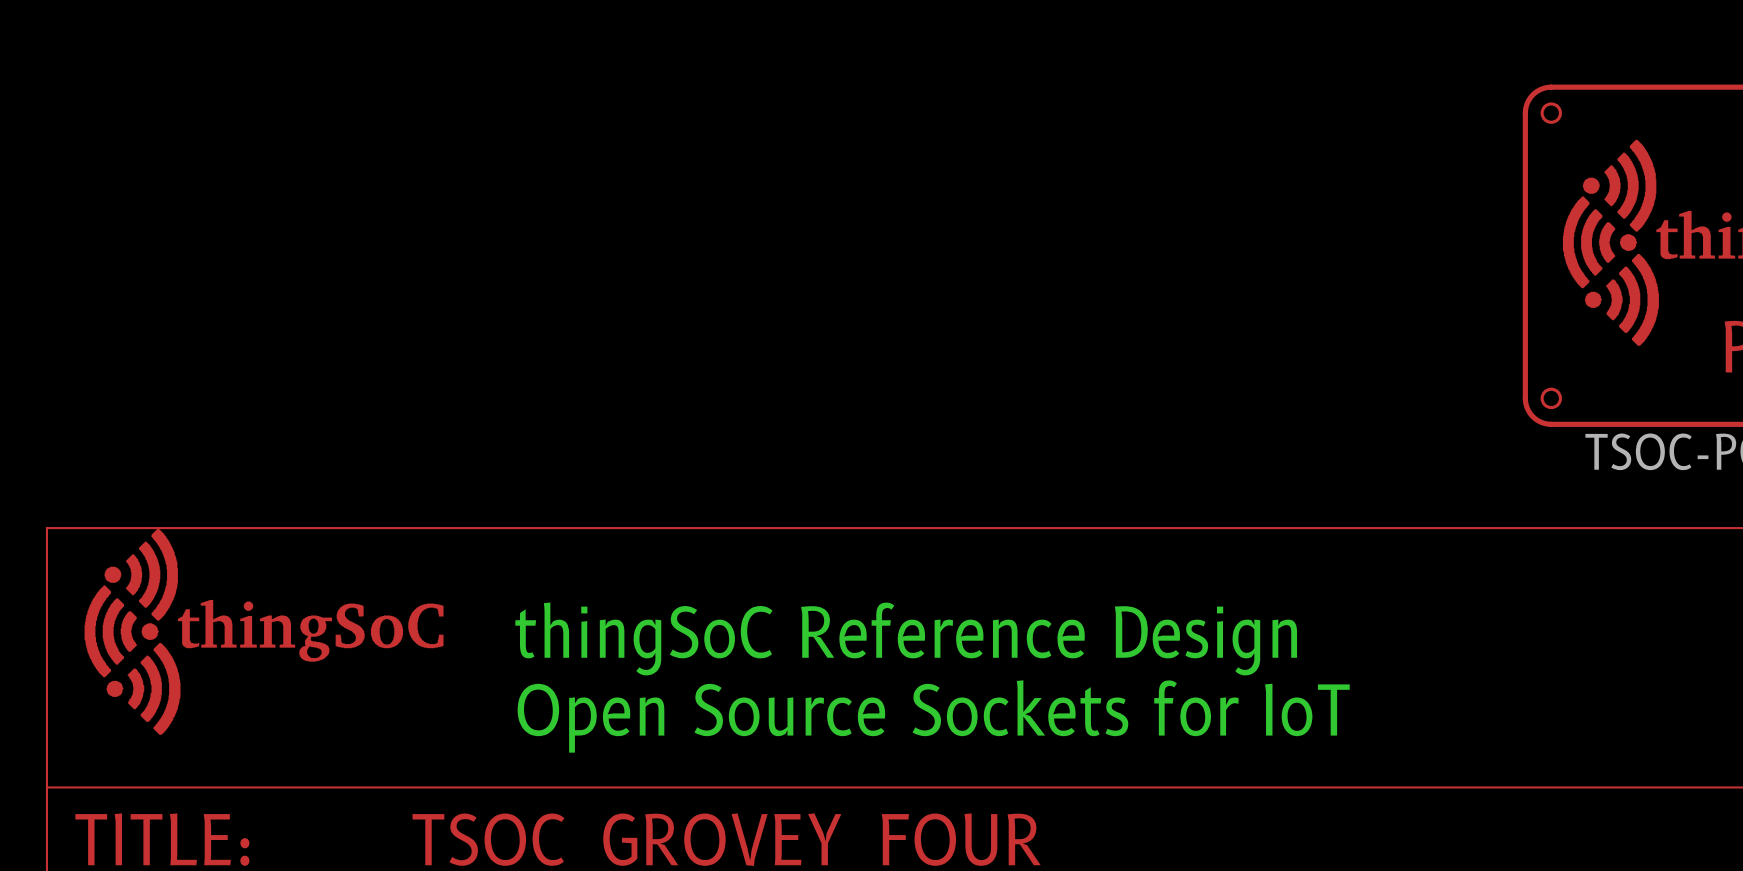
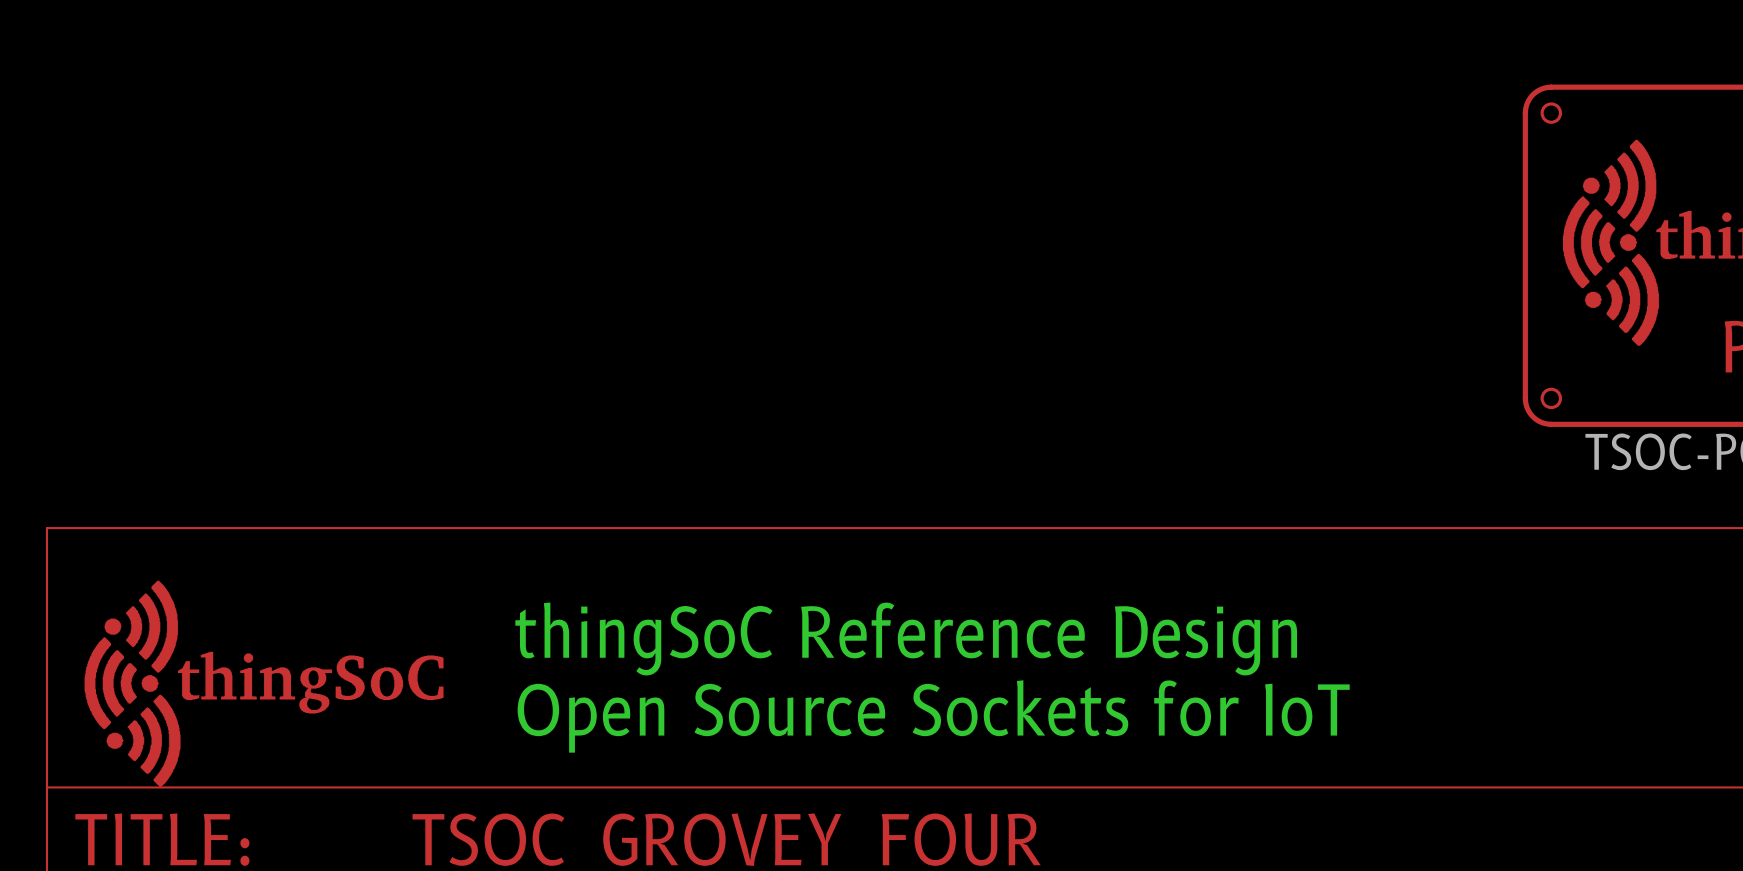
part position: (264, 631) -> (264, 683)

